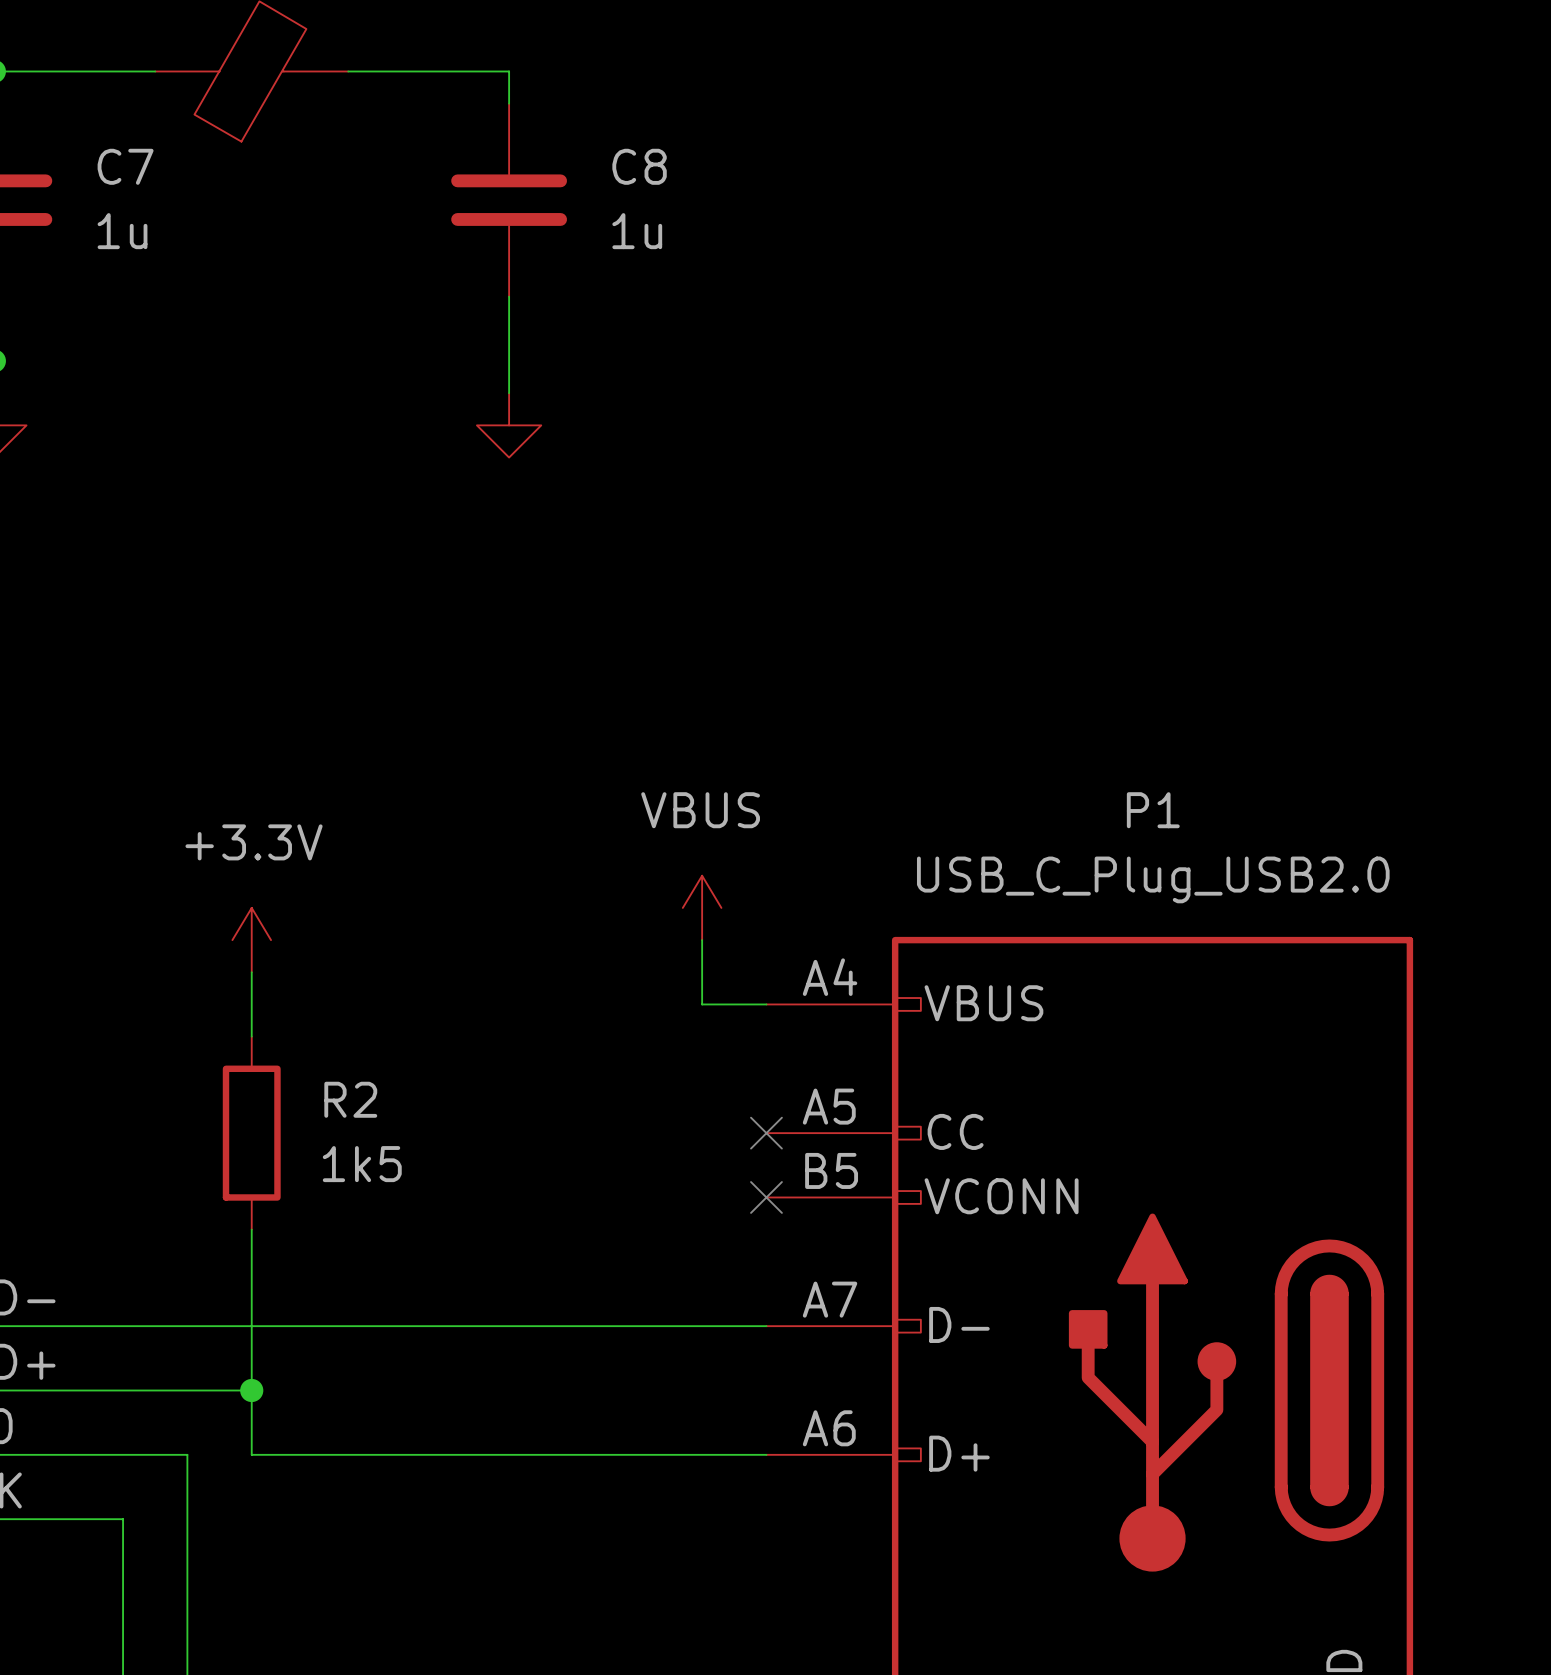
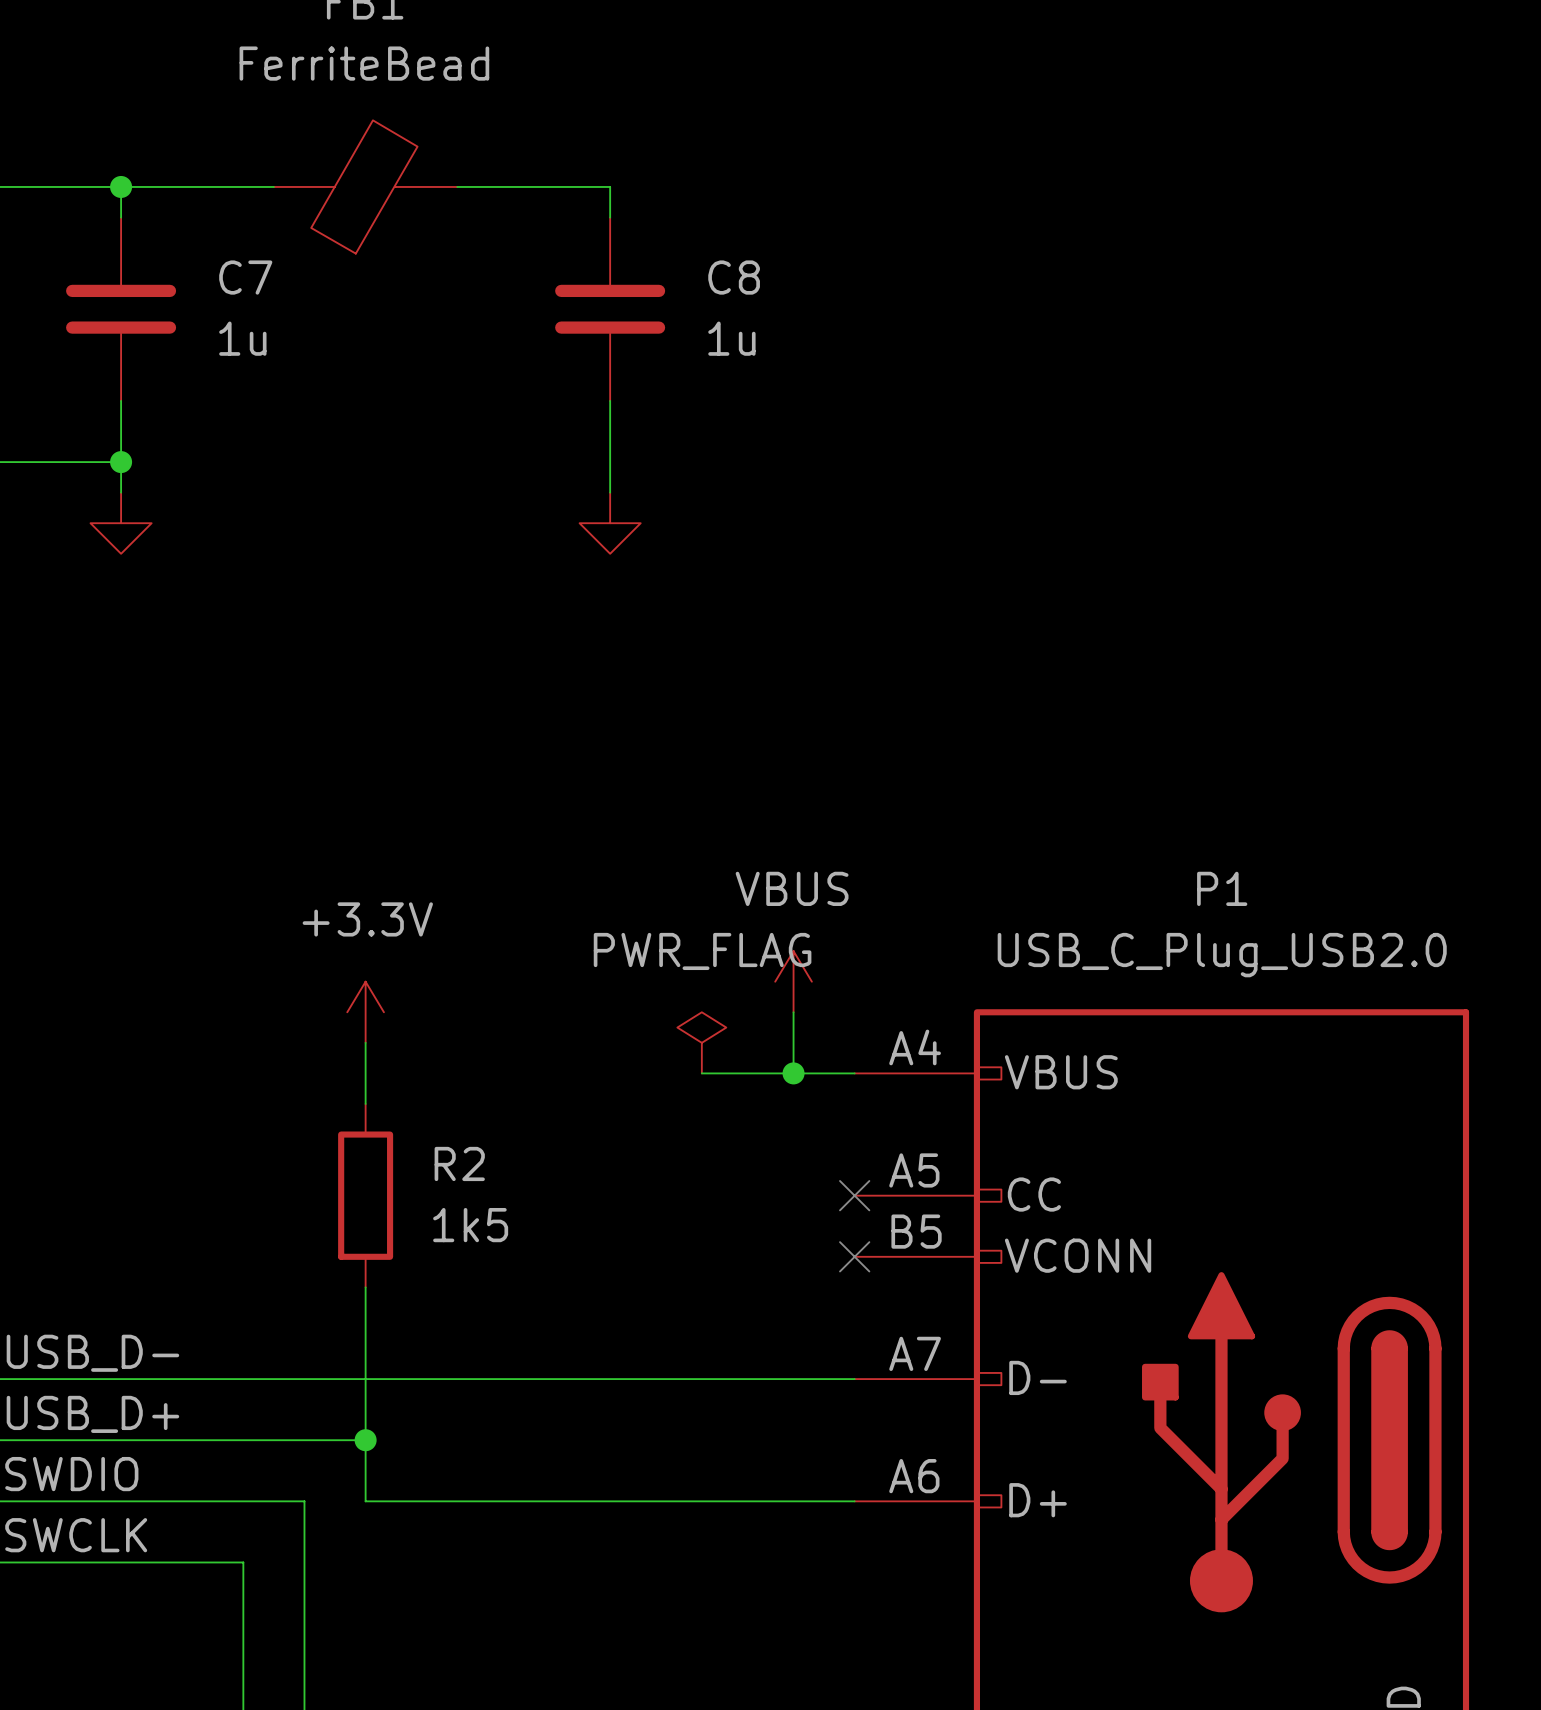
power symbol: none -> PWR_FLAG (701, 1042)
wire: none -> (701, 1073) (793, 1073)
junction: none -> (793, 1073)

